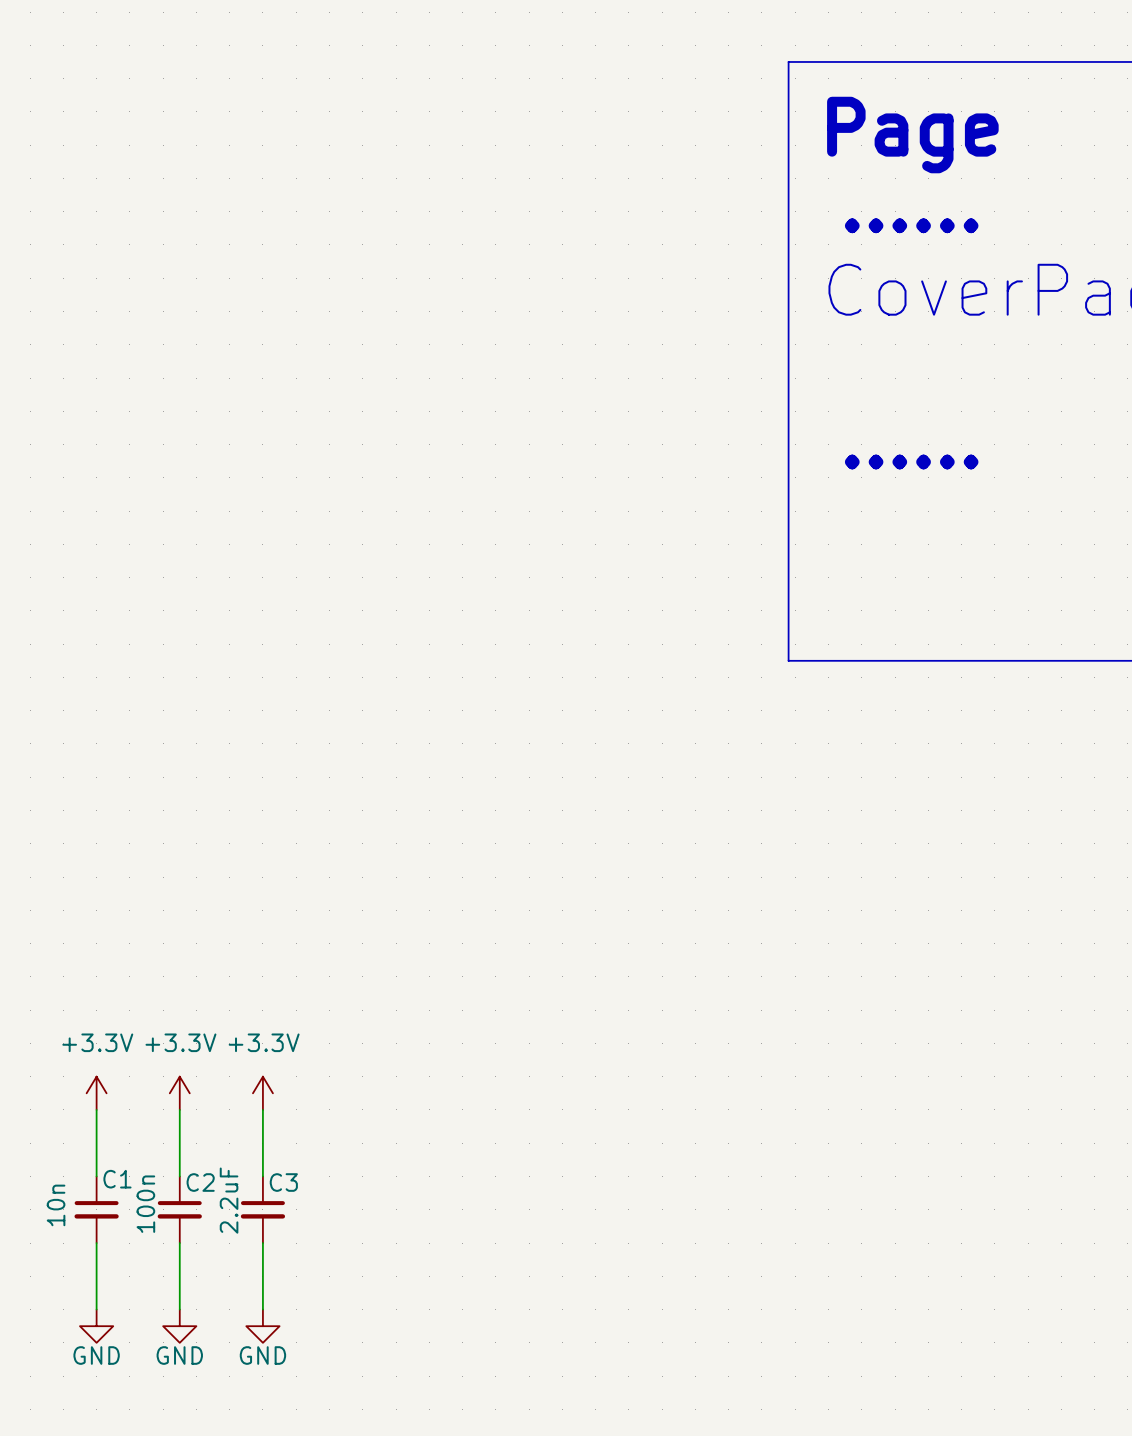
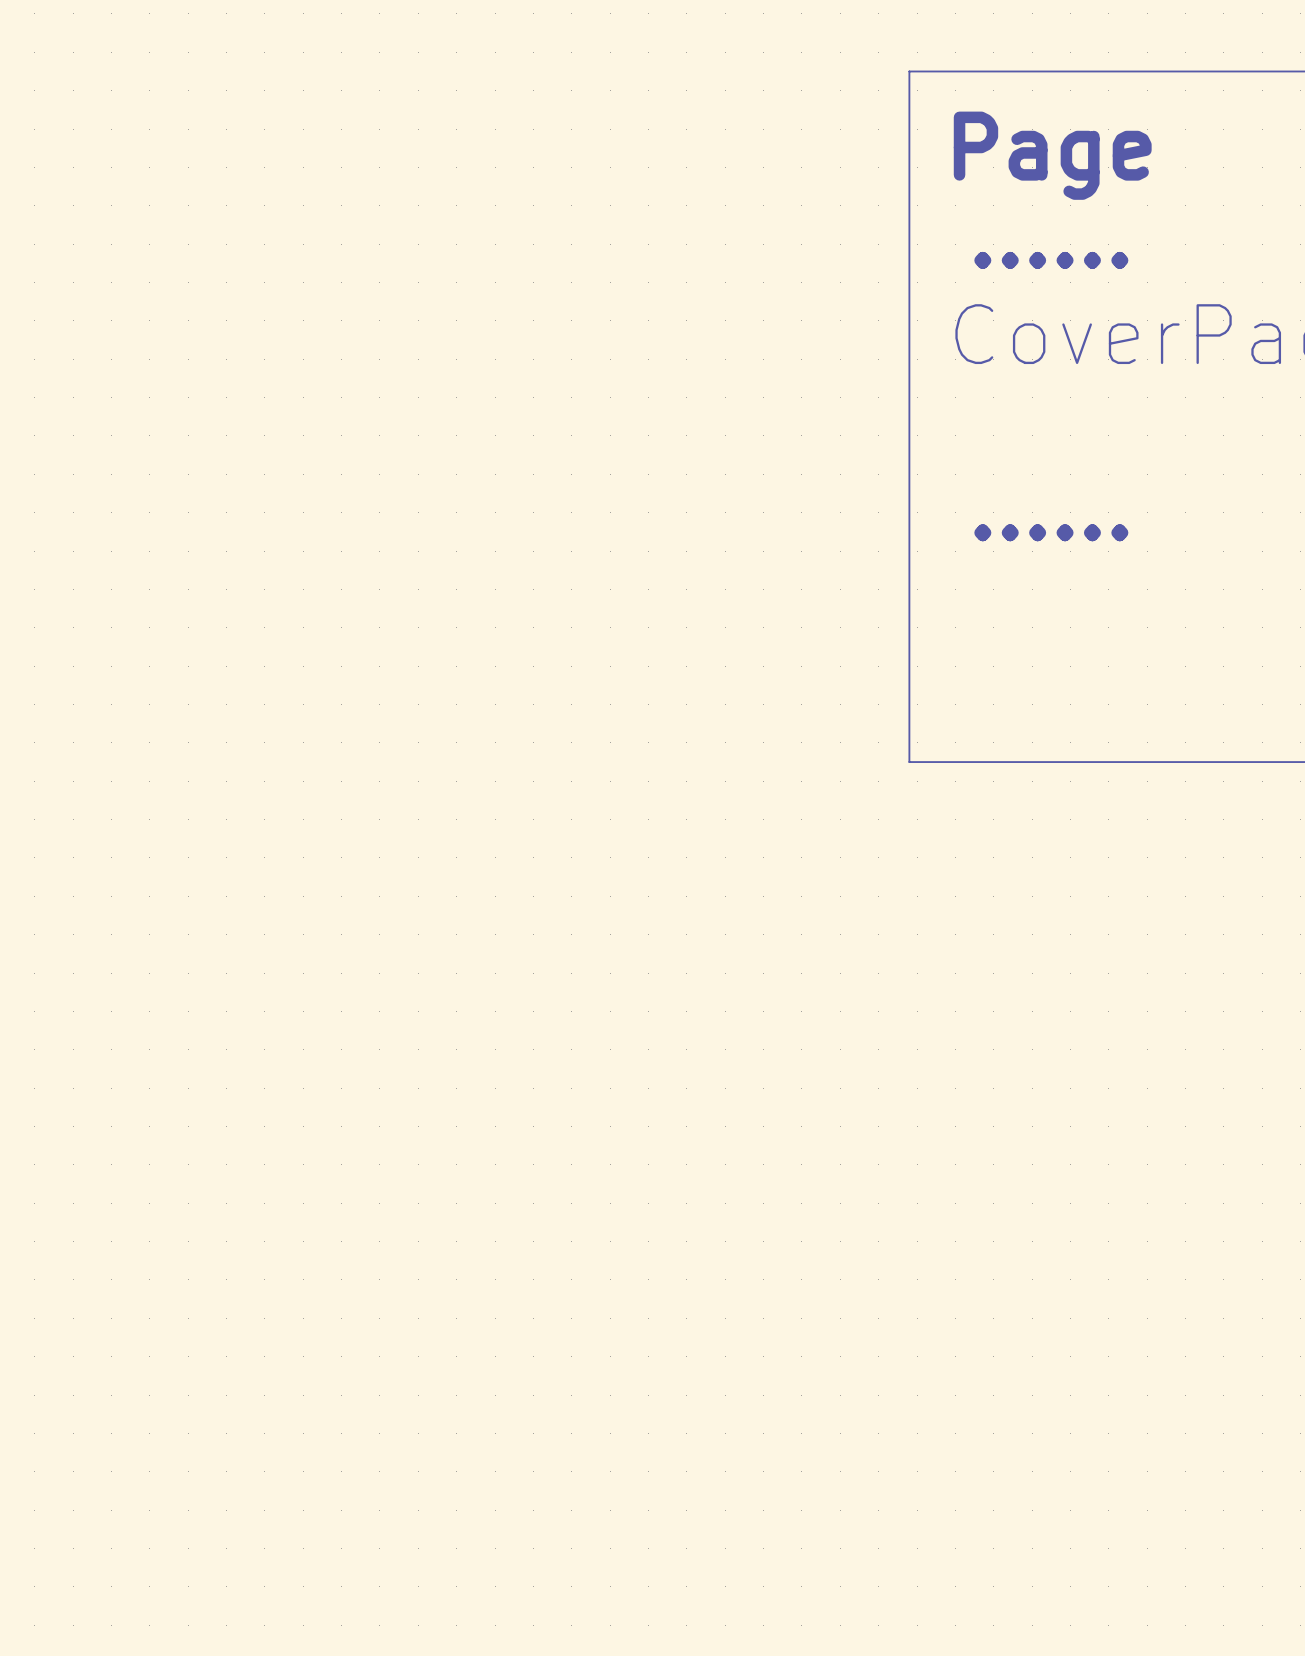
power symbol: +3.3V (96, 1093) -> none
power symbol: +3.3V (179, 1093) -> none
power symbol: +3.3V (262, 1093) -> none
wire: (96, 1109) (96, 1176) -> none
wire: (179, 1109) (179, 1176) -> none
wire: (262, 1109) (262, 1176) -> none
C1: 10n (96, 1209) -> none
C2: 100n (179, 1209) -> none
C3: 2.2uF (262, 1209) -> none
wire: (96, 1243) (96, 1309) -> none
wire: (179, 1243) (179, 1309) -> none
wire: (262, 1243) (262, 1309) -> none
power symbol: GND (96, 1326) -> none
power symbol: GND (179, 1326) -> none
power symbol: GND (262, 1326) -> none

